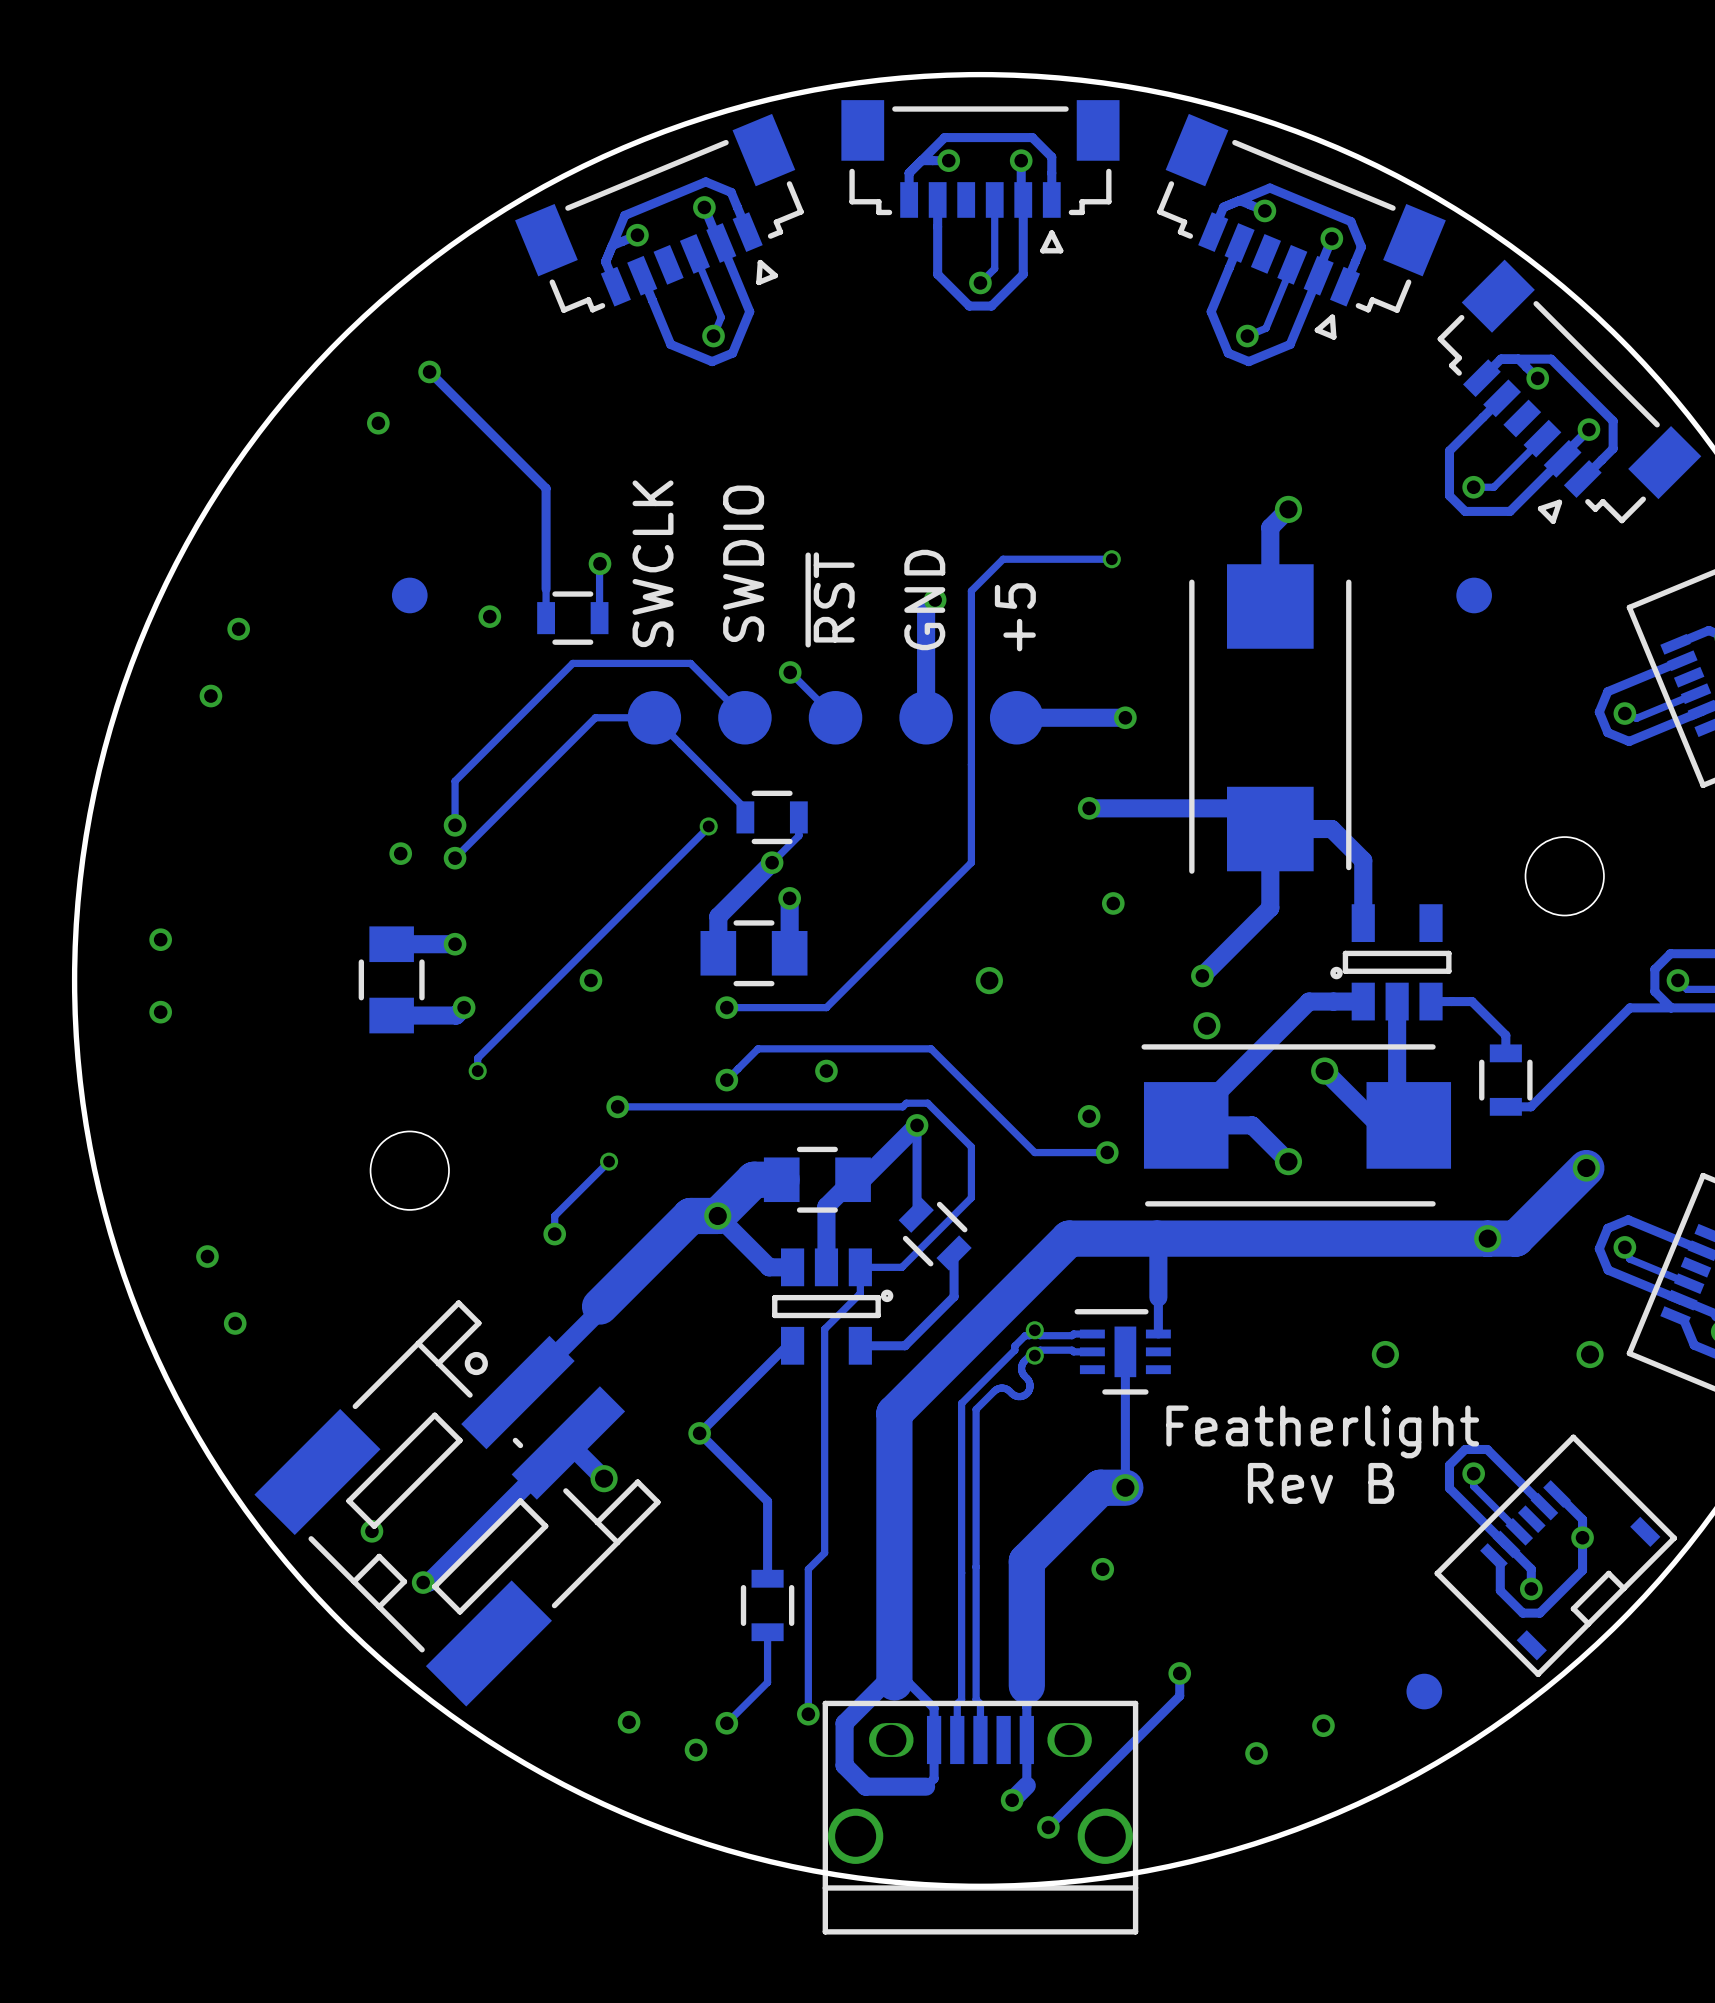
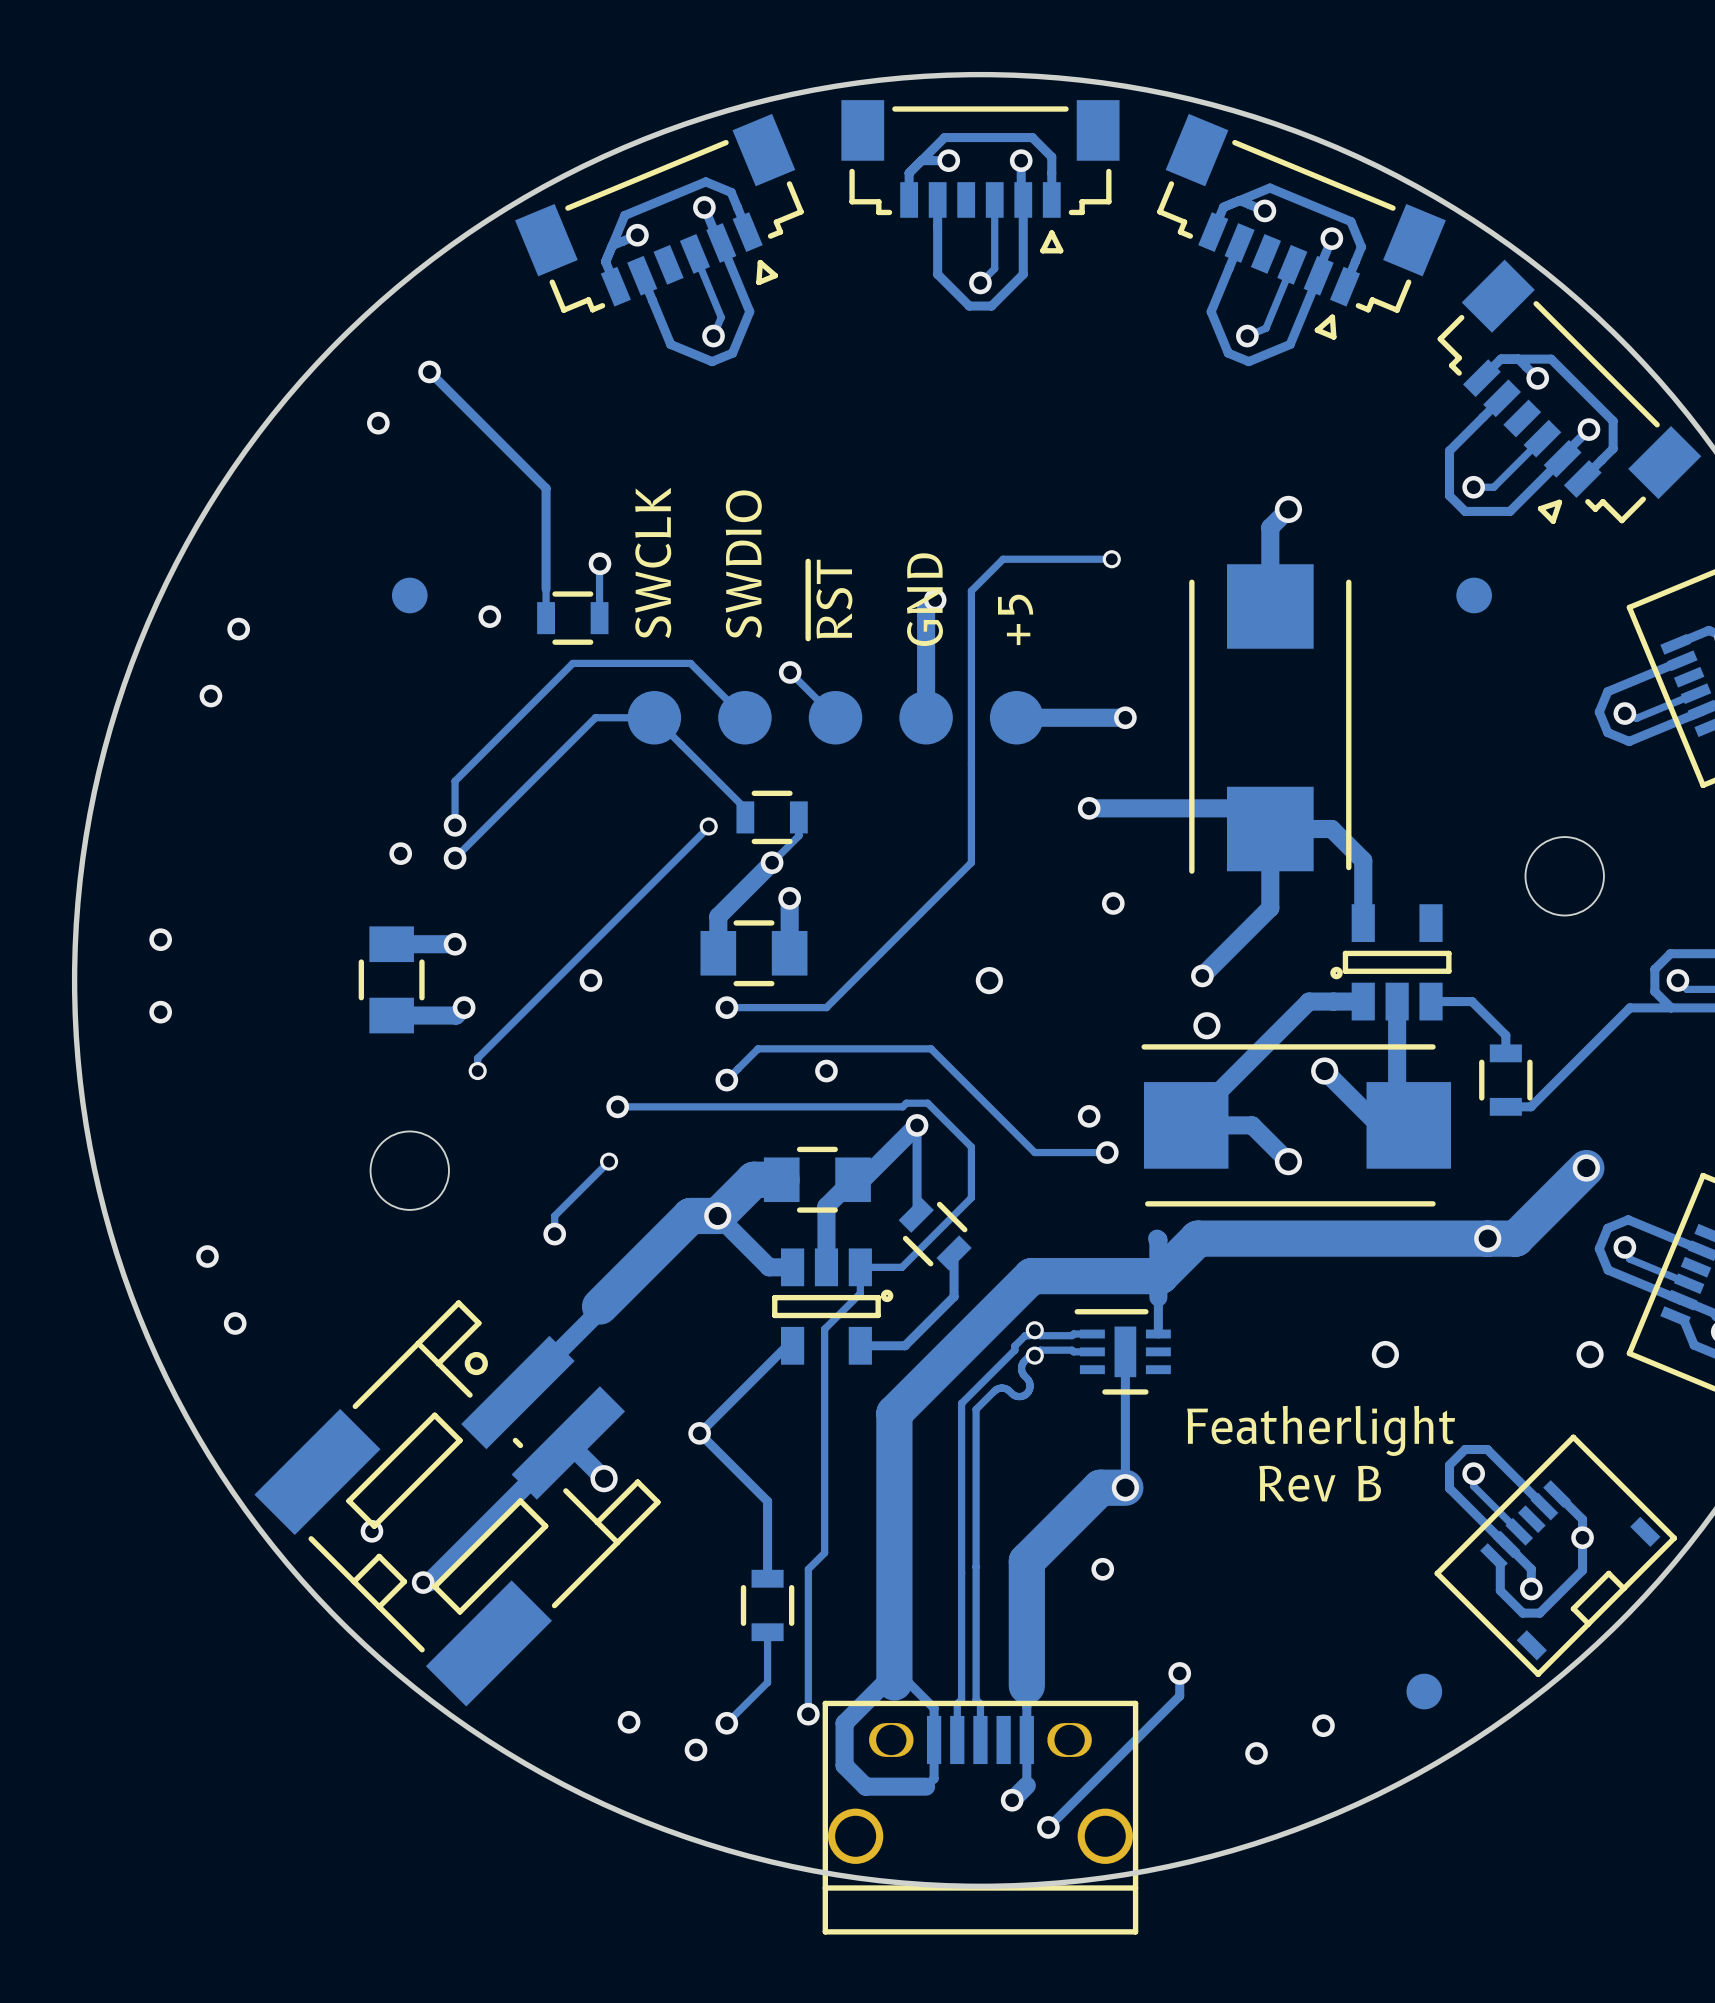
track: (1197, 1238) (1069, 1238) (1031, 1276) -> (1197, 1238) (1160, 1276) (1031, 1276)

